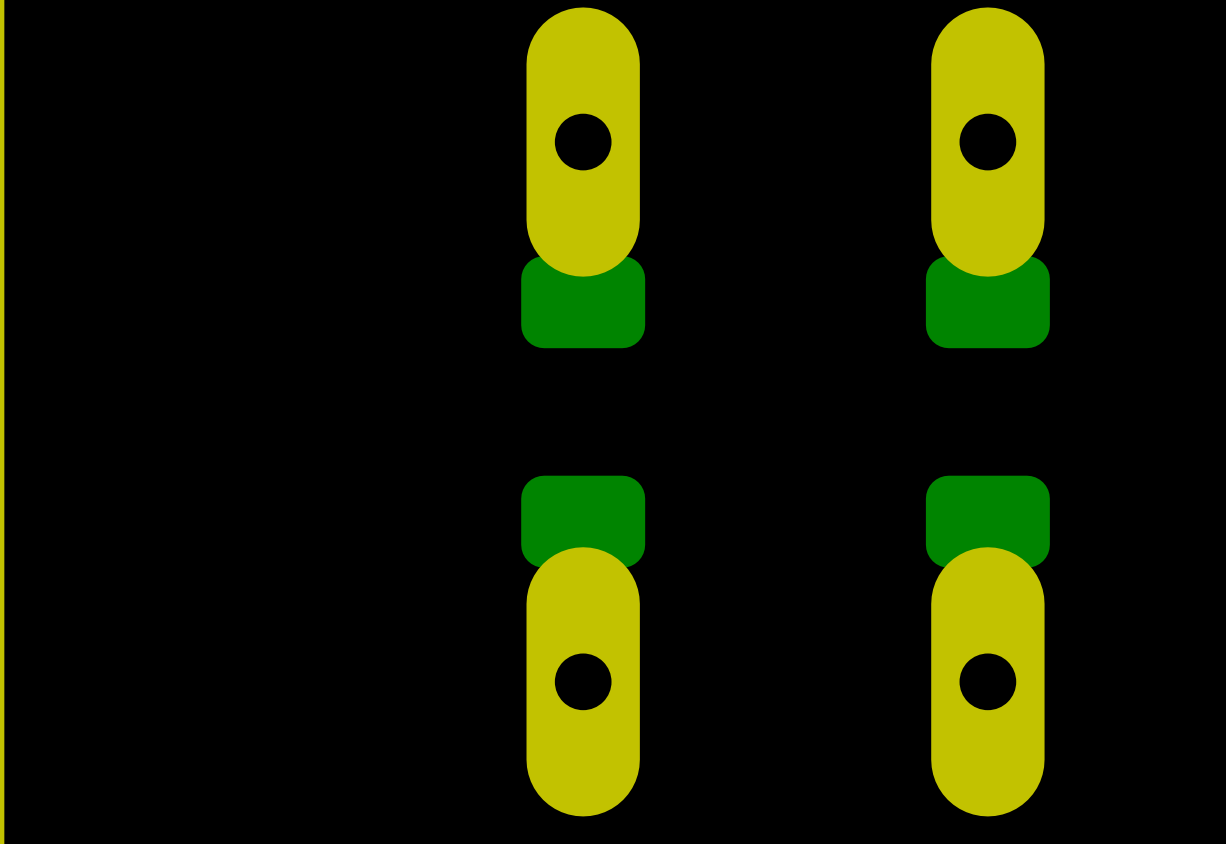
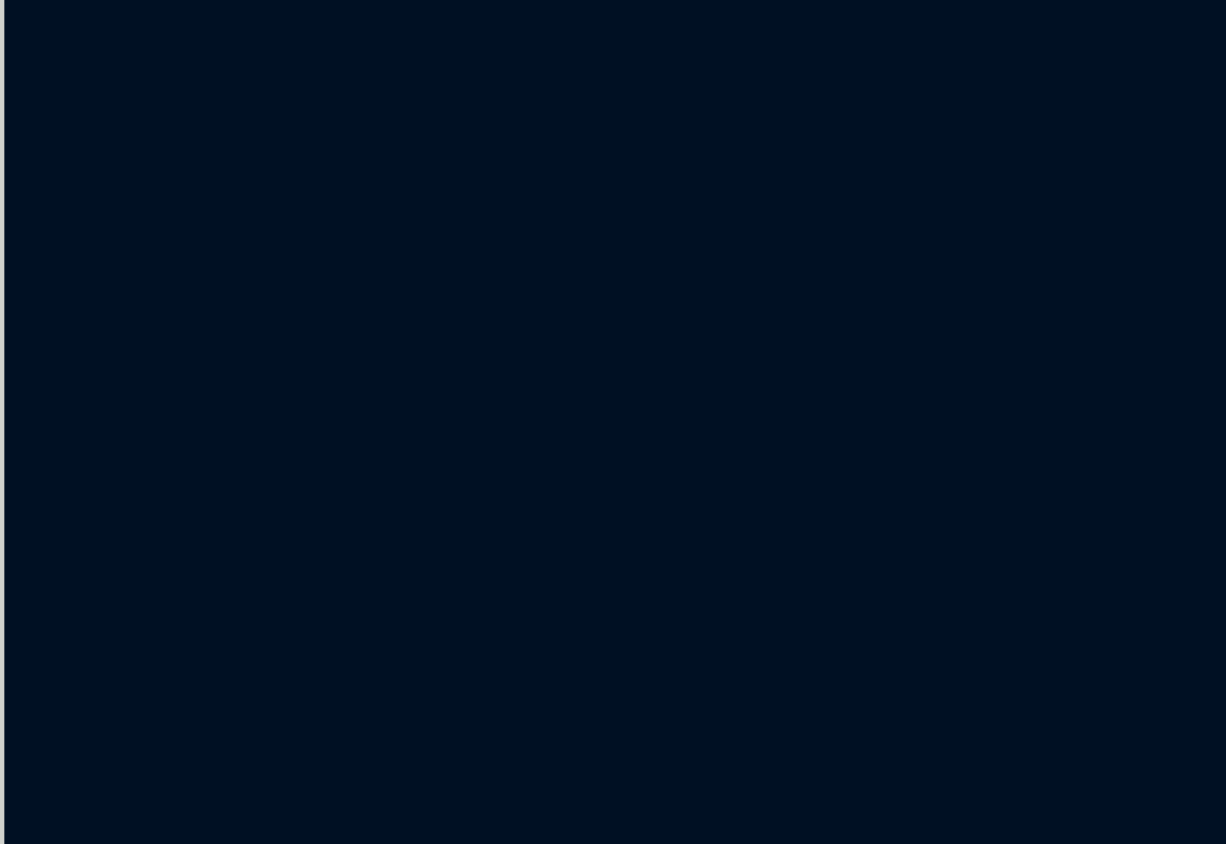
part: (583, 411) -> none
part: (987, 411) -> none

